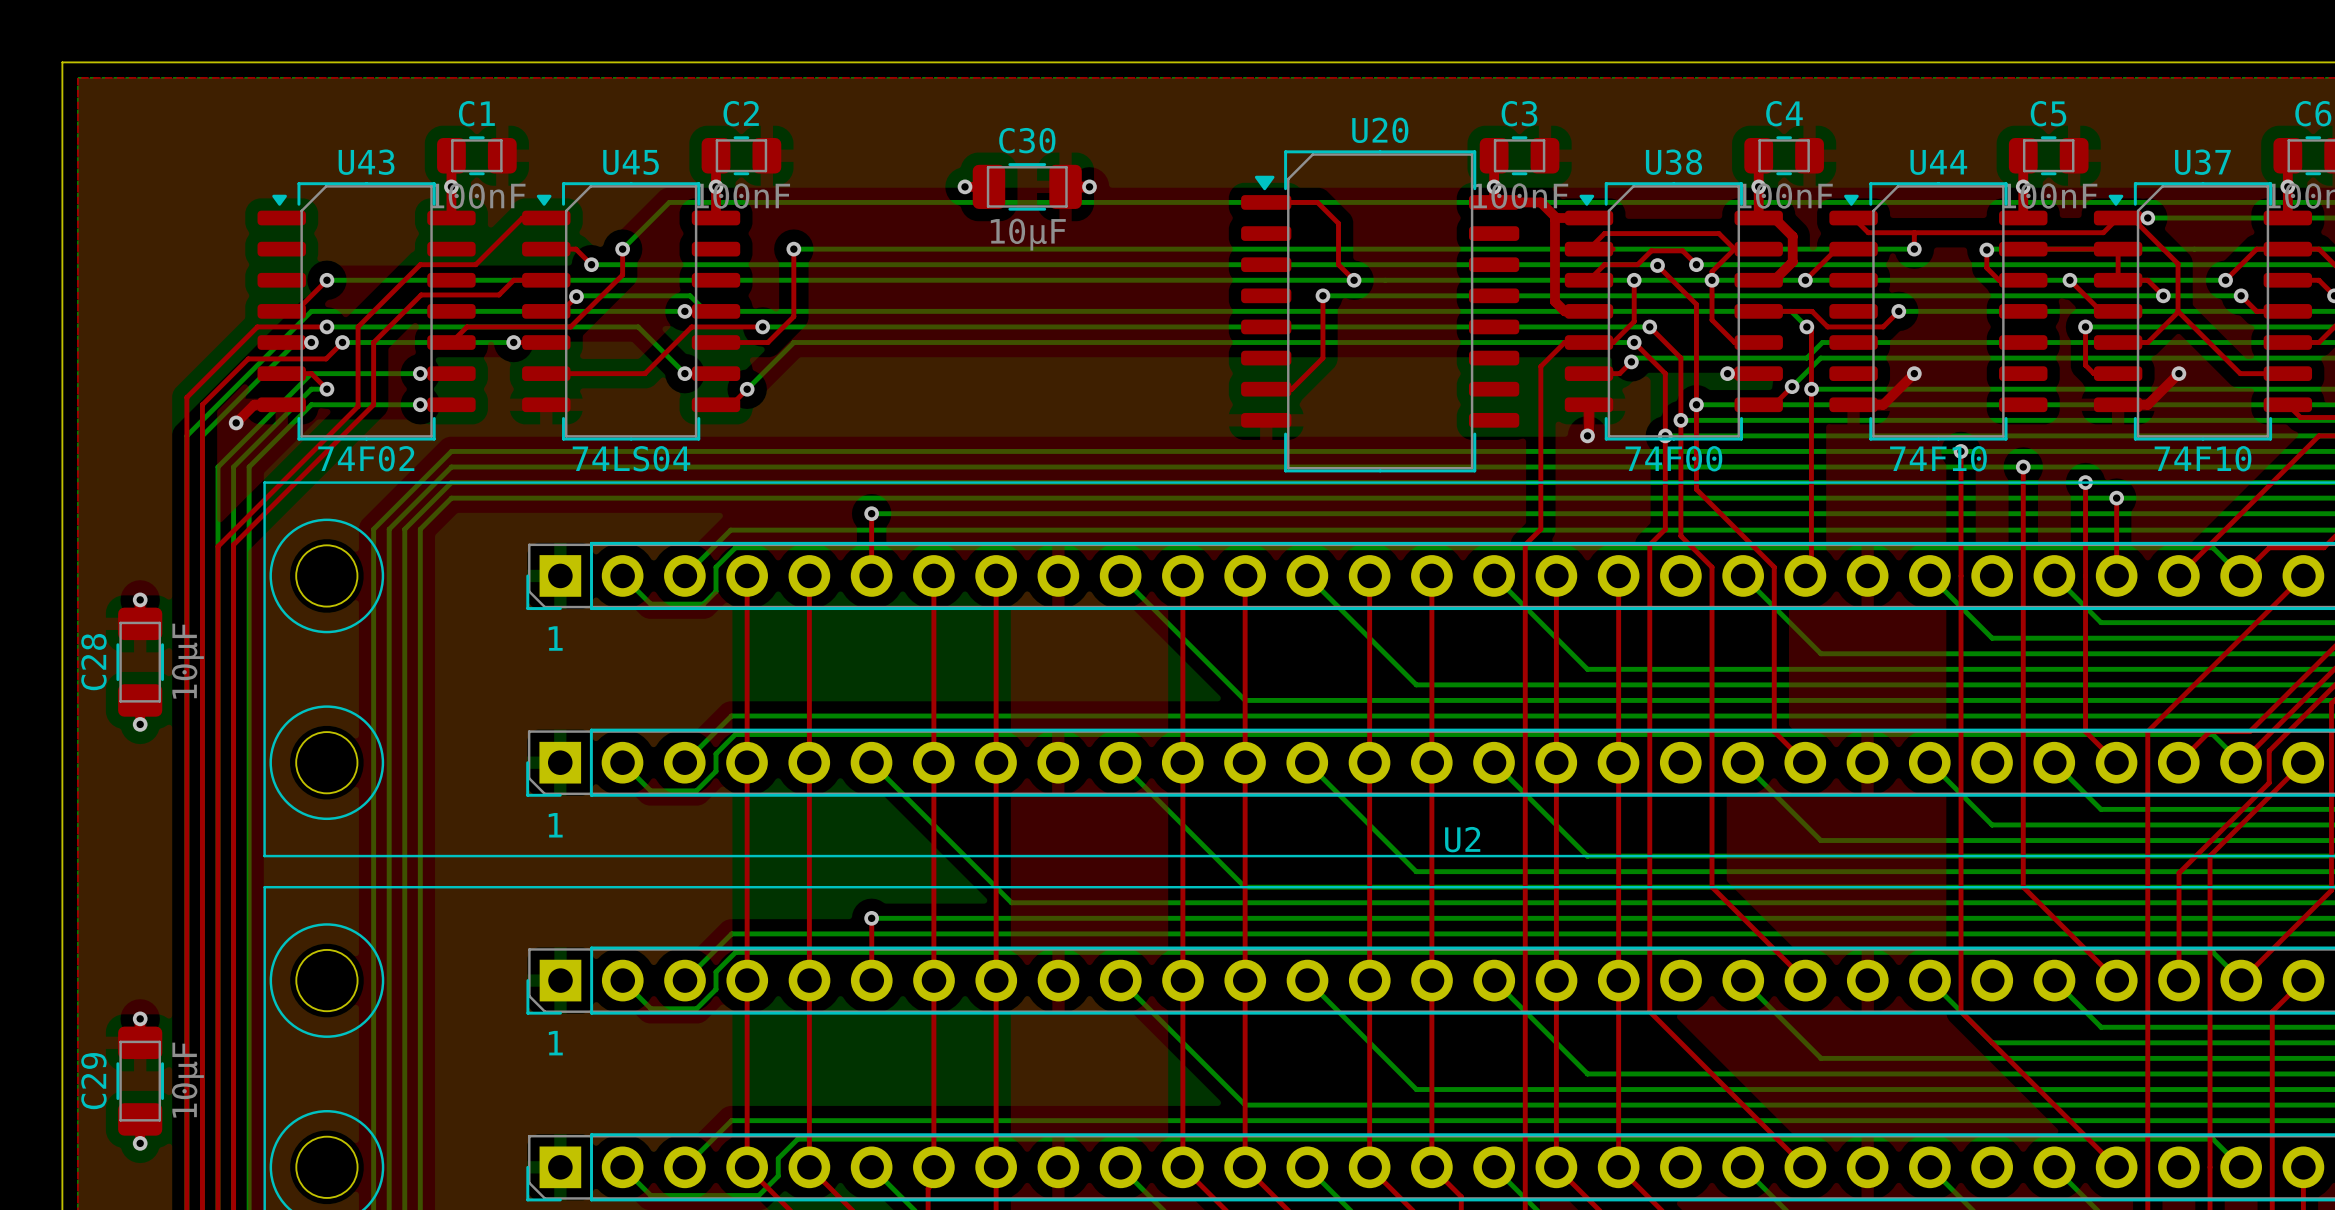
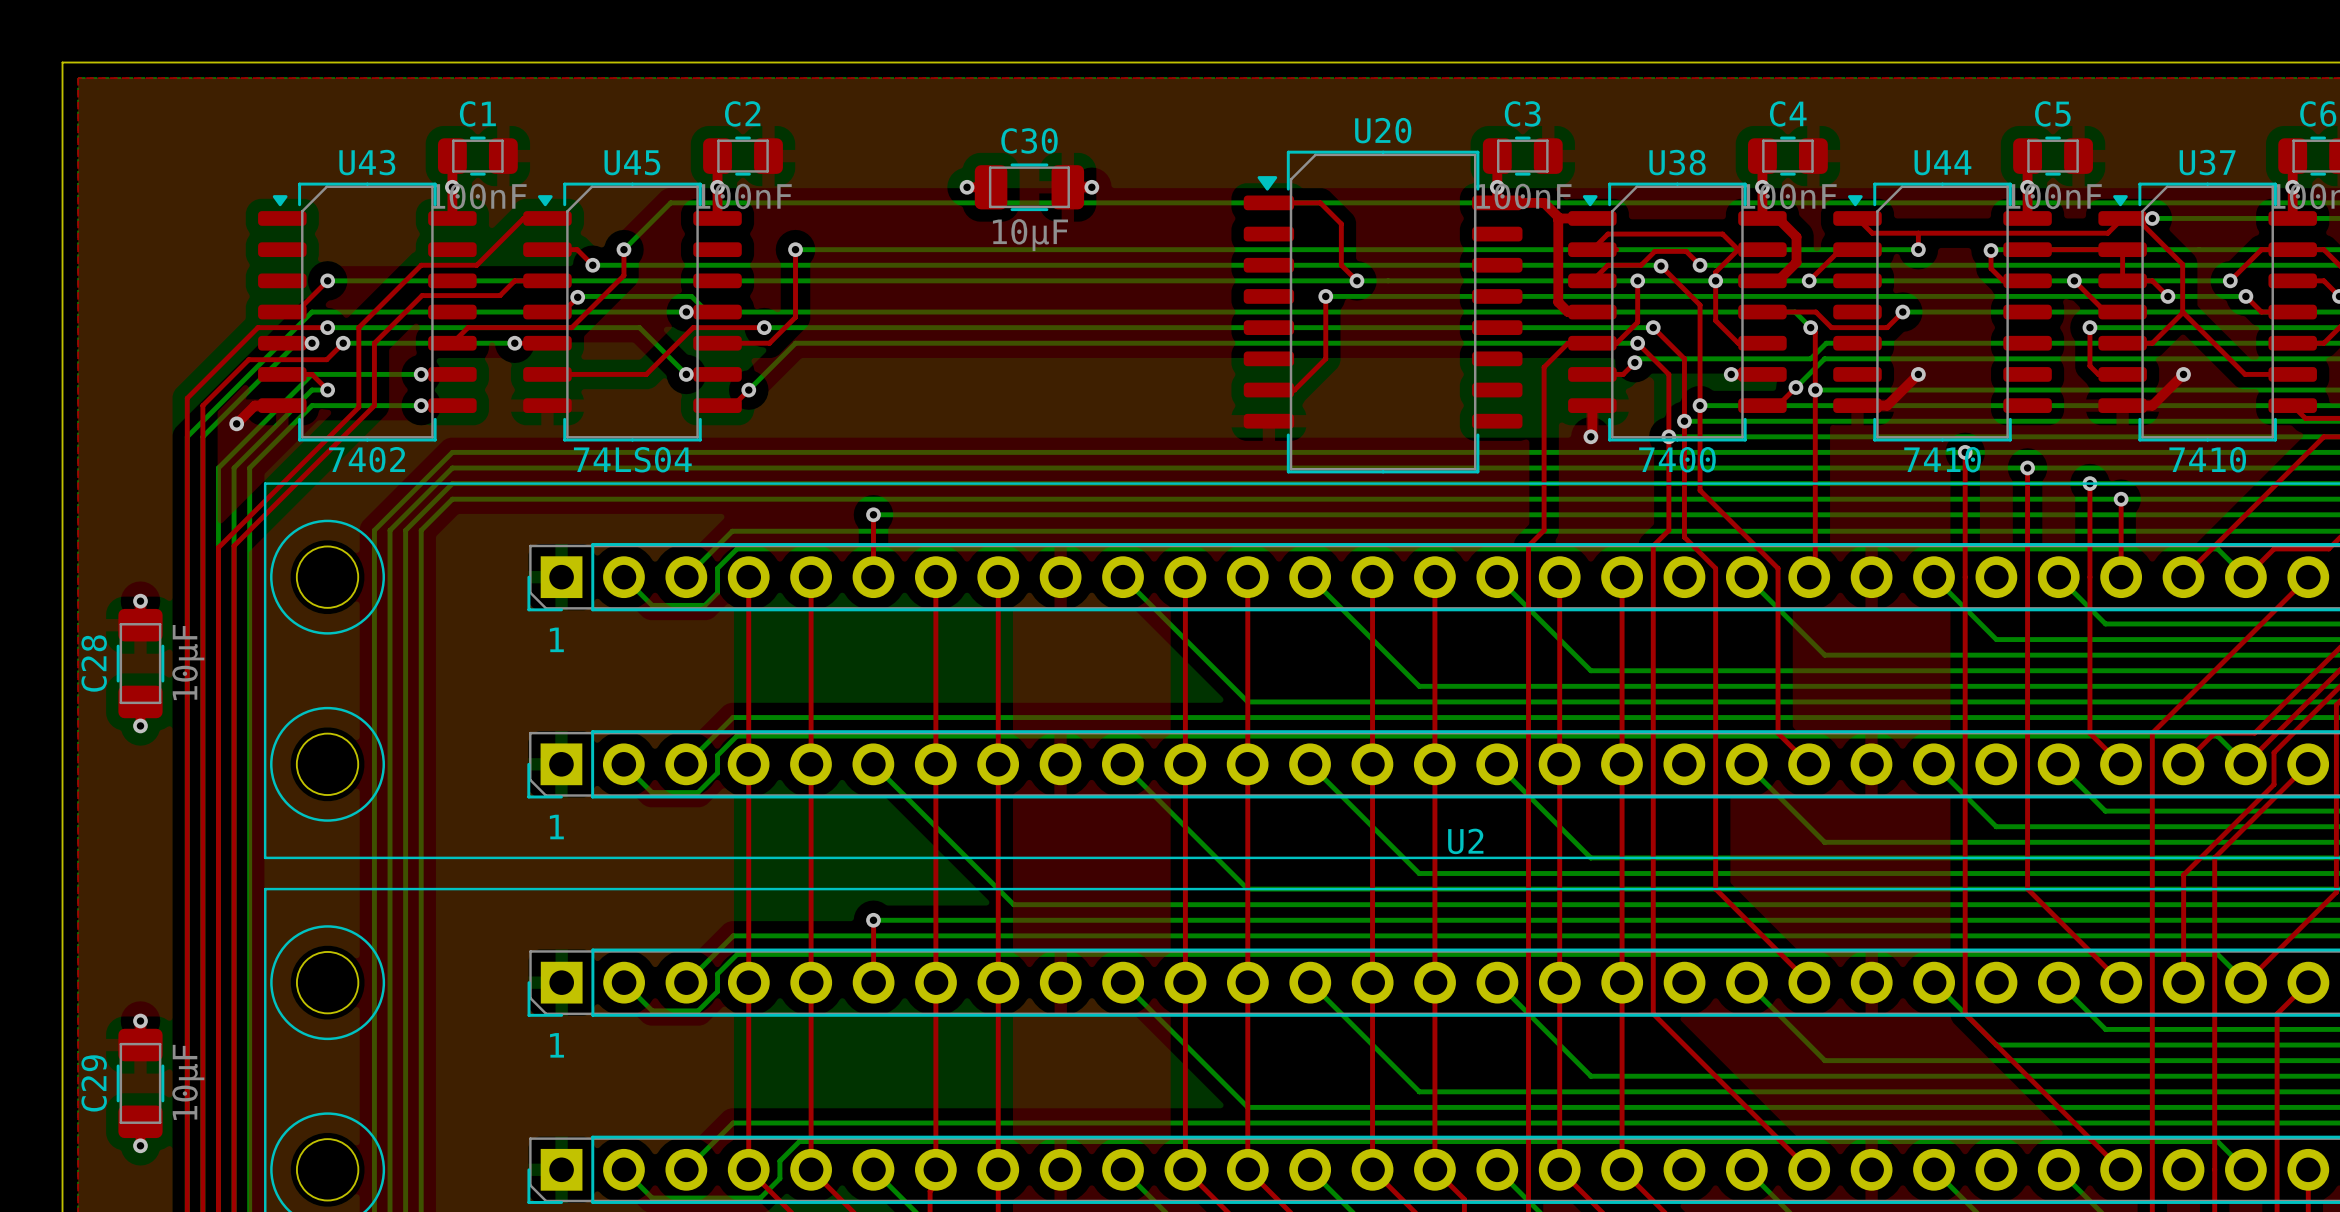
U43 value: 74F02 (366, 458) -> 7402 (367, 459)
U38 value: 74F00 (1673, 458) -> 7400 (1677, 459)
U44 value: 74F10 (1938, 458) -> 7410 (1942, 459)
U37 value: 74F10 (2203, 458) -> 7410 (2207, 459)

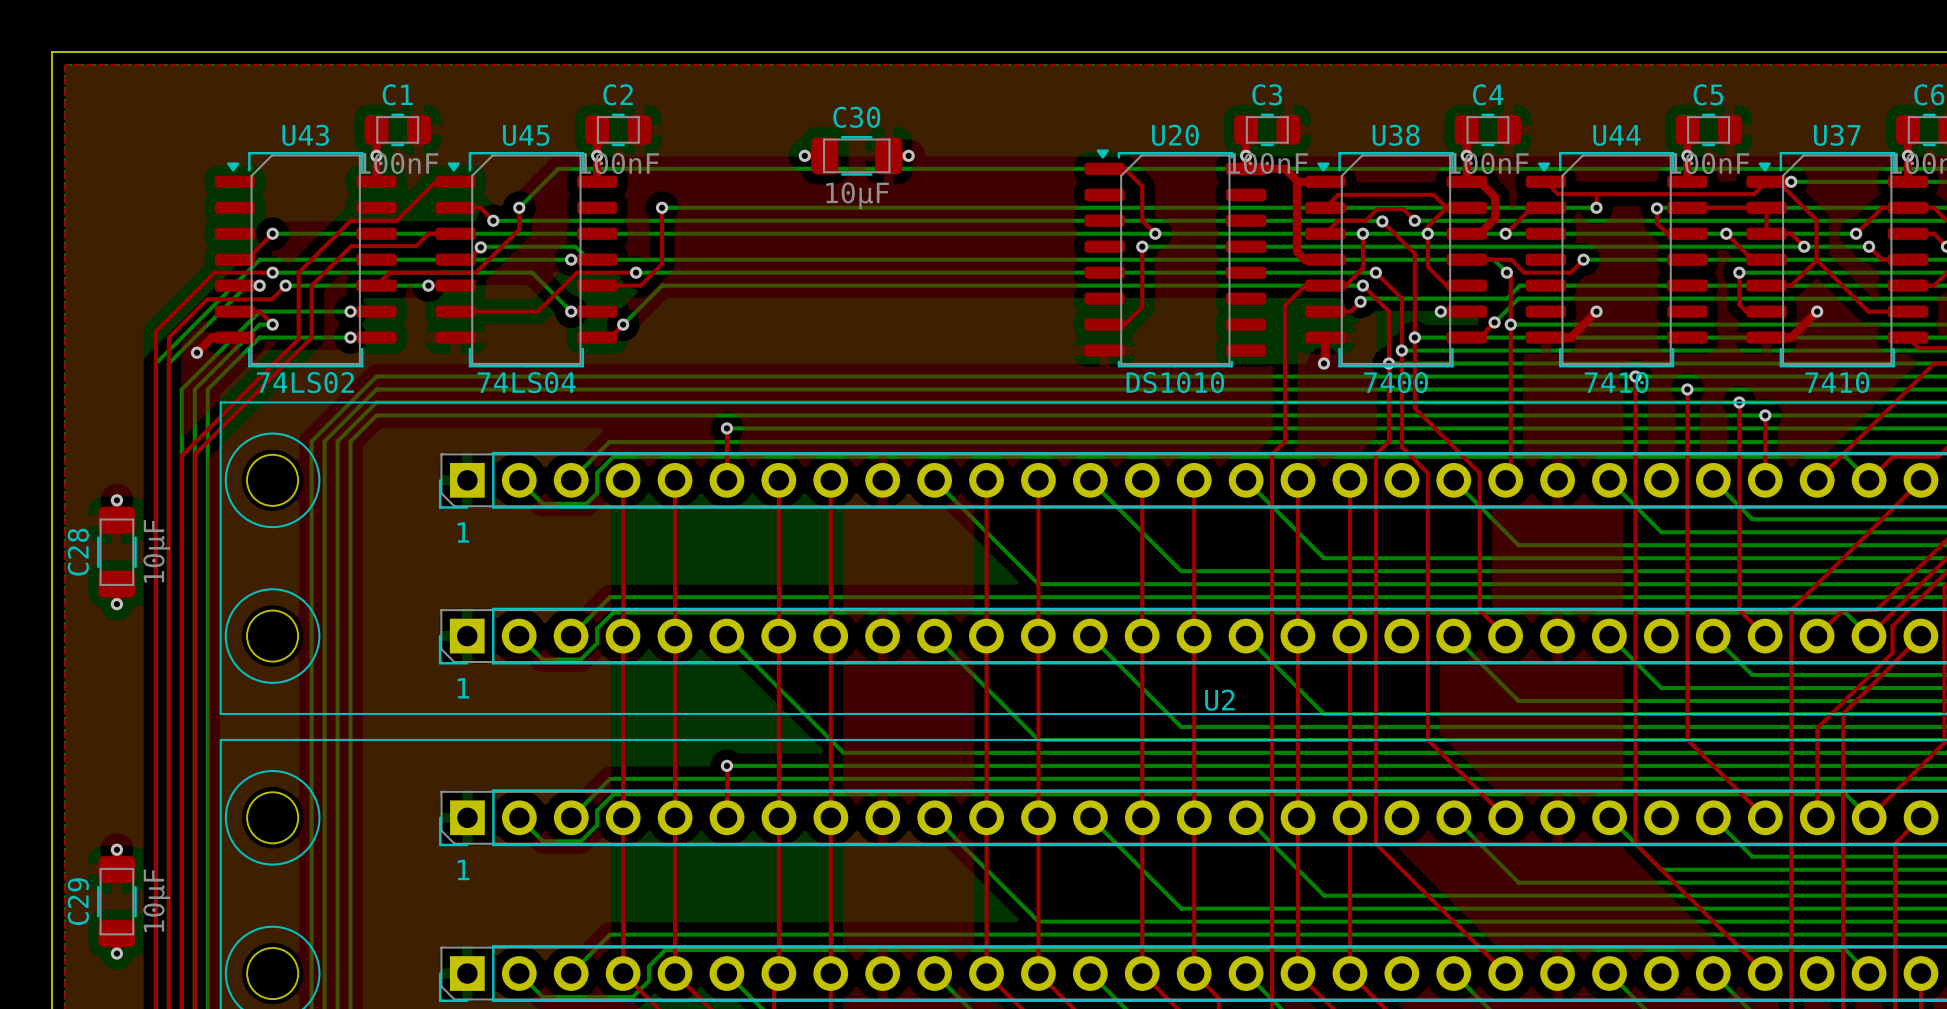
U20 footprint: [1243, 150, 1523, 474] -> [1084, 149, 1267, 368]
top track: (1268, 202) (1320, 202) (1341, 223) (1341, 265) (1356, 280) -> none
top track: none -> (1104, 168) (1124, 168) (1142, 186) (1142, 220) (1155, 233)
via: (1356, 280) -> none
via: none -> (1155, 233)
bottom track: (1325, 296) (1372, 296) -> none
top track: (1325, 296) (1325, 358) (1294, 390) (1268, 390) -> none
via: (1325, 296) -> none
top track: none -> (1142, 246) (1142, 307) (1124, 324) (1104, 324)
via: none -> (1142, 246)
U43 value: 7402 (367, 459) -> 74LS02 (305, 382)
U20 value: none -> DS1010 (1175, 382)

